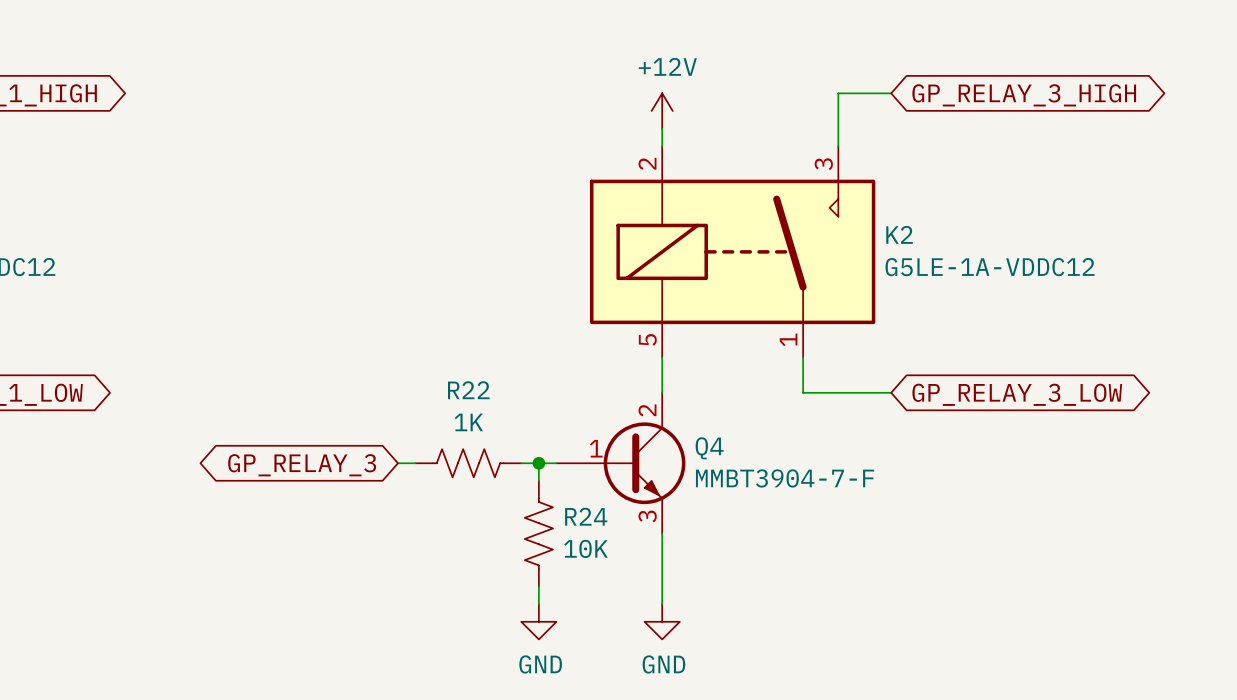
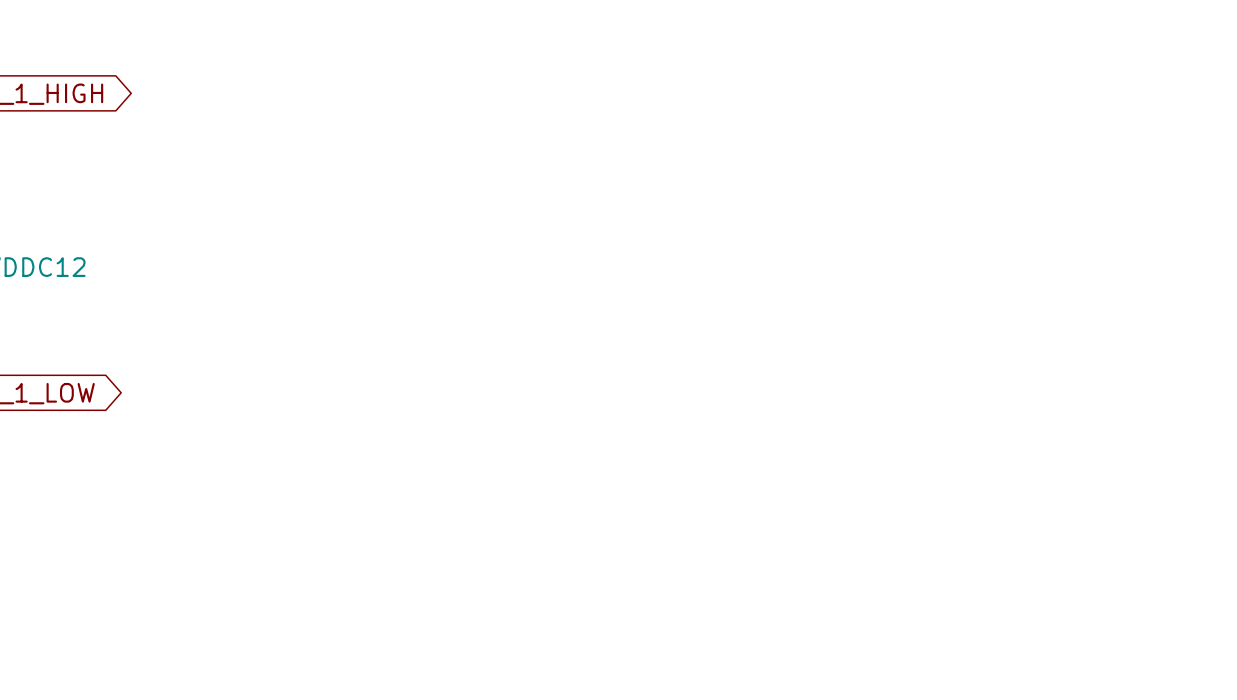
wire: (891, 93) (838, 93) (838, 146) -> none
global label: GP_RELAY_3_HIGH (1024, 95) -> none
power symbol: +12V (662, 110) -> none
wire: (662, 128) (662, 146) -> none
K2: G5LE-1A-VDDC12 (732, 251) -> none
wire: (662, 357) (662, 392) -> none
wire: (803, 357) (803, 392) (891, 392) -> none
global label: GP_RELAY_3_LOW (1017, 394) -> none
wire: (397, 463) (415, 463) -> none
R22: 1K (468, 463) -> none
wire: (521, 463) (556, 463) -> none
wire: (538, 463) (538, 480) -> none
junction: (538, 463) -> none
Q4: MMBT3904-7-F (620, 463) -> none
global label: GP_RELAY_3 (302, 465) -> none
R24: 10K (538, 533) -> none
wire: (662, 533) (662, 604) -> none
wire: (538, 586) (538, 604) -> none
power symbol: GND (538, 621) -> none
power symbol: GND (662, 621) -> none

